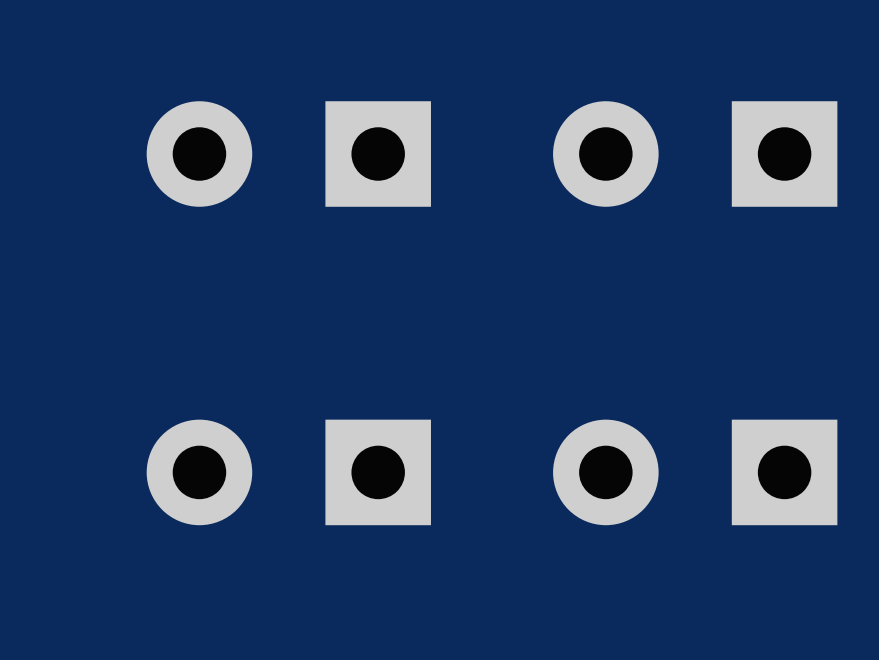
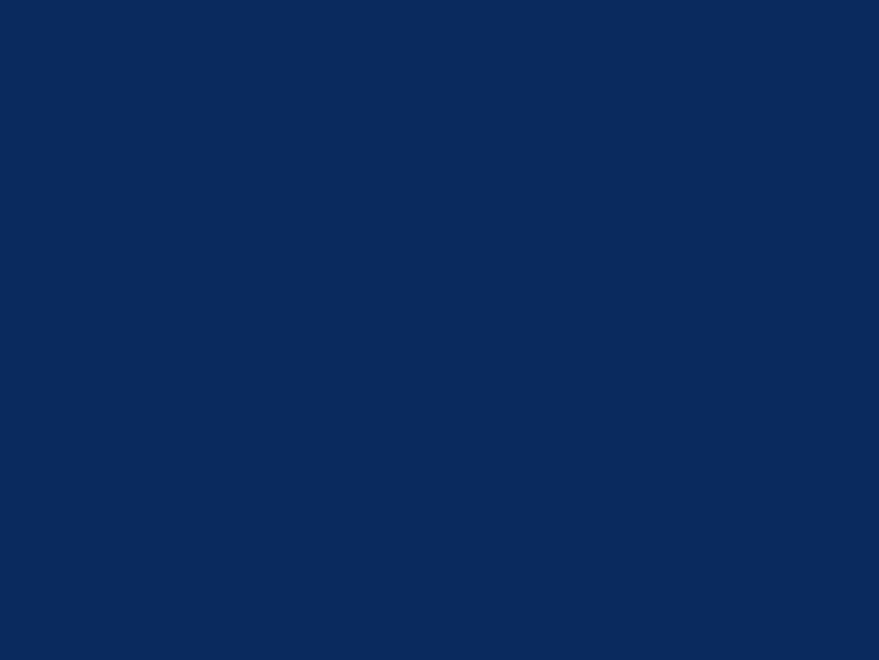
part: (288, 154) -> none
part: (695, 154) -> none
part: (288, 472) -> none
part: (695, 472) -> none

